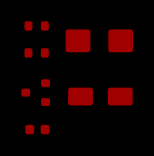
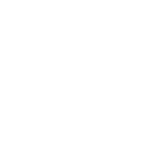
part: (36, 25) -> none
part: (99, 40) -> none
part: (36, 52) -> none
part: (35, 92) -> none
part: (100, 96) -> none
part: (37, 129) -> none

